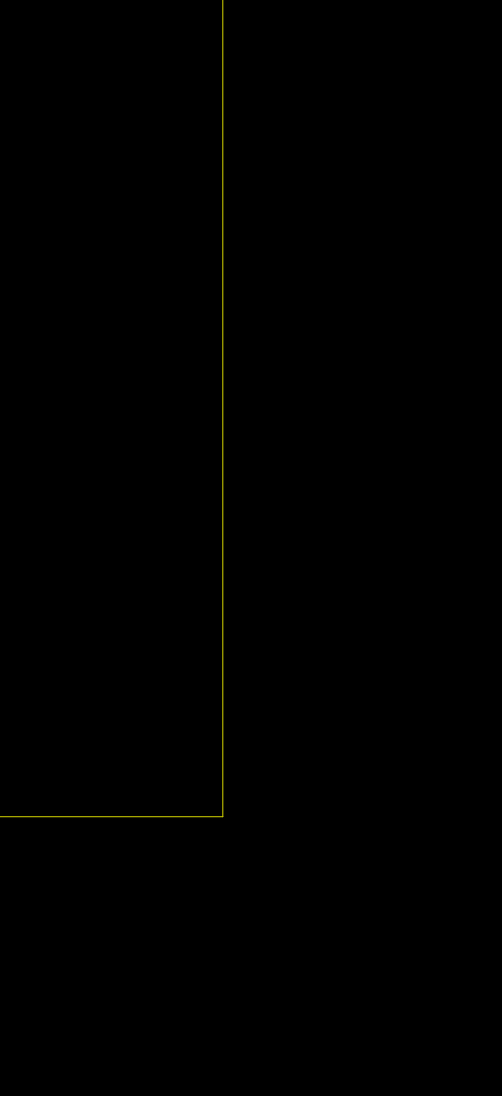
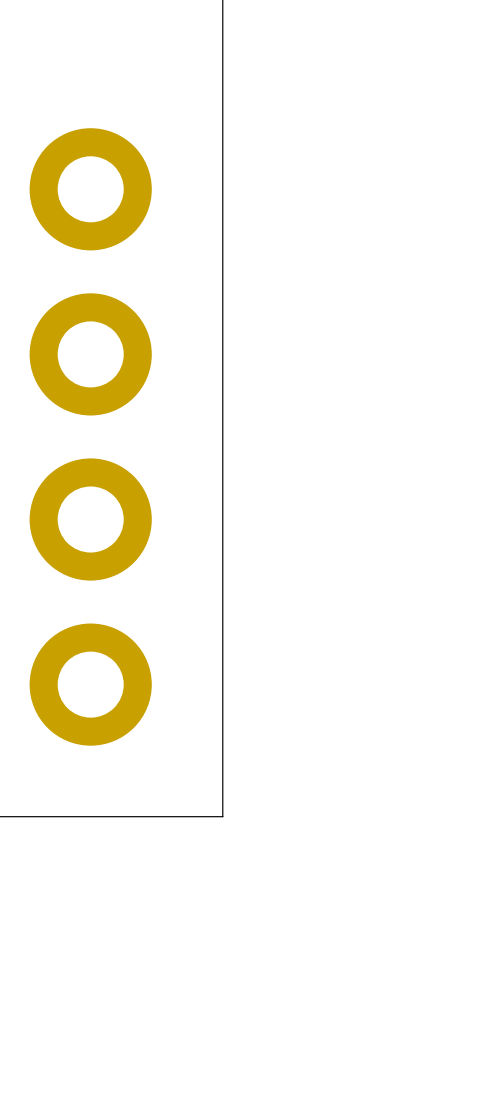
part: none -> (90, 436)

